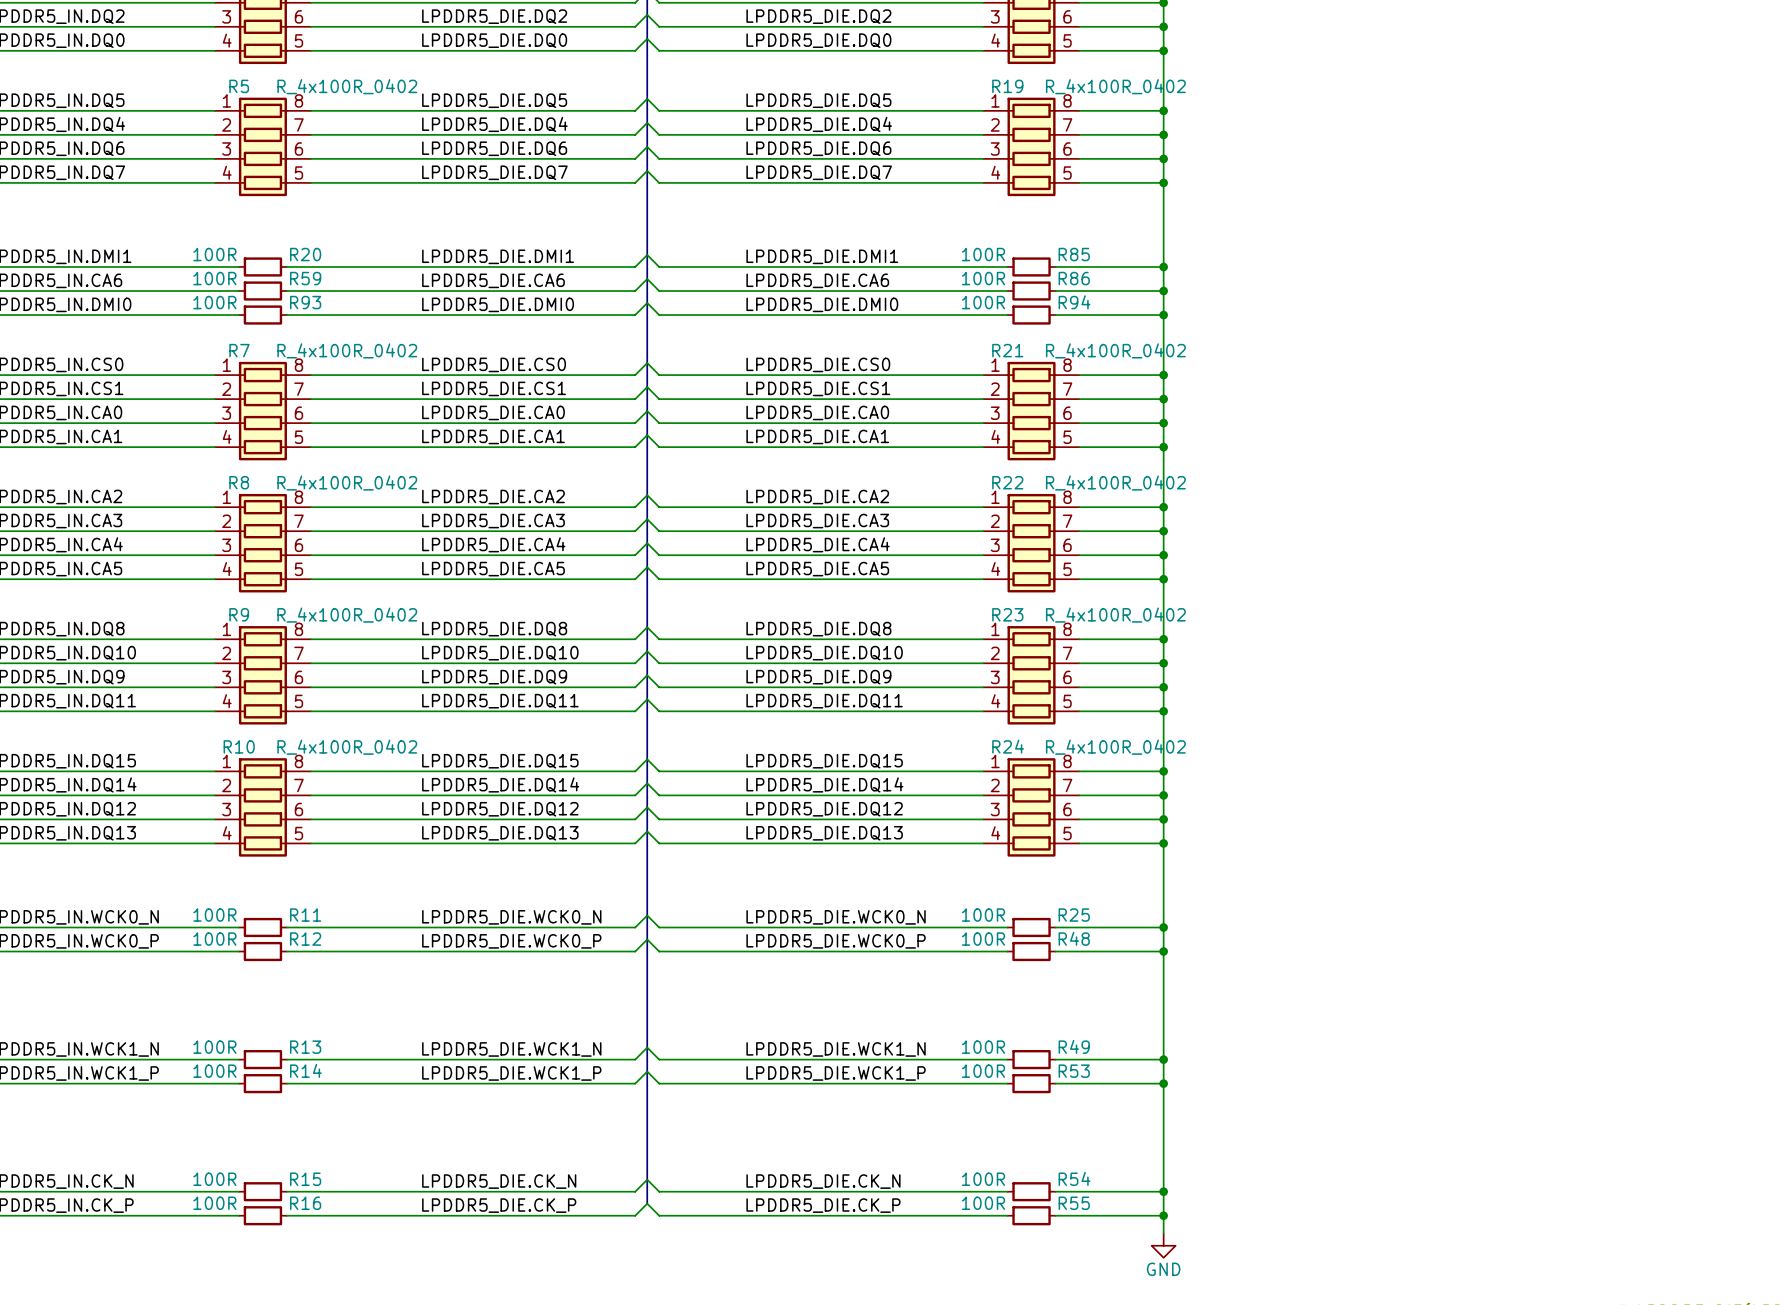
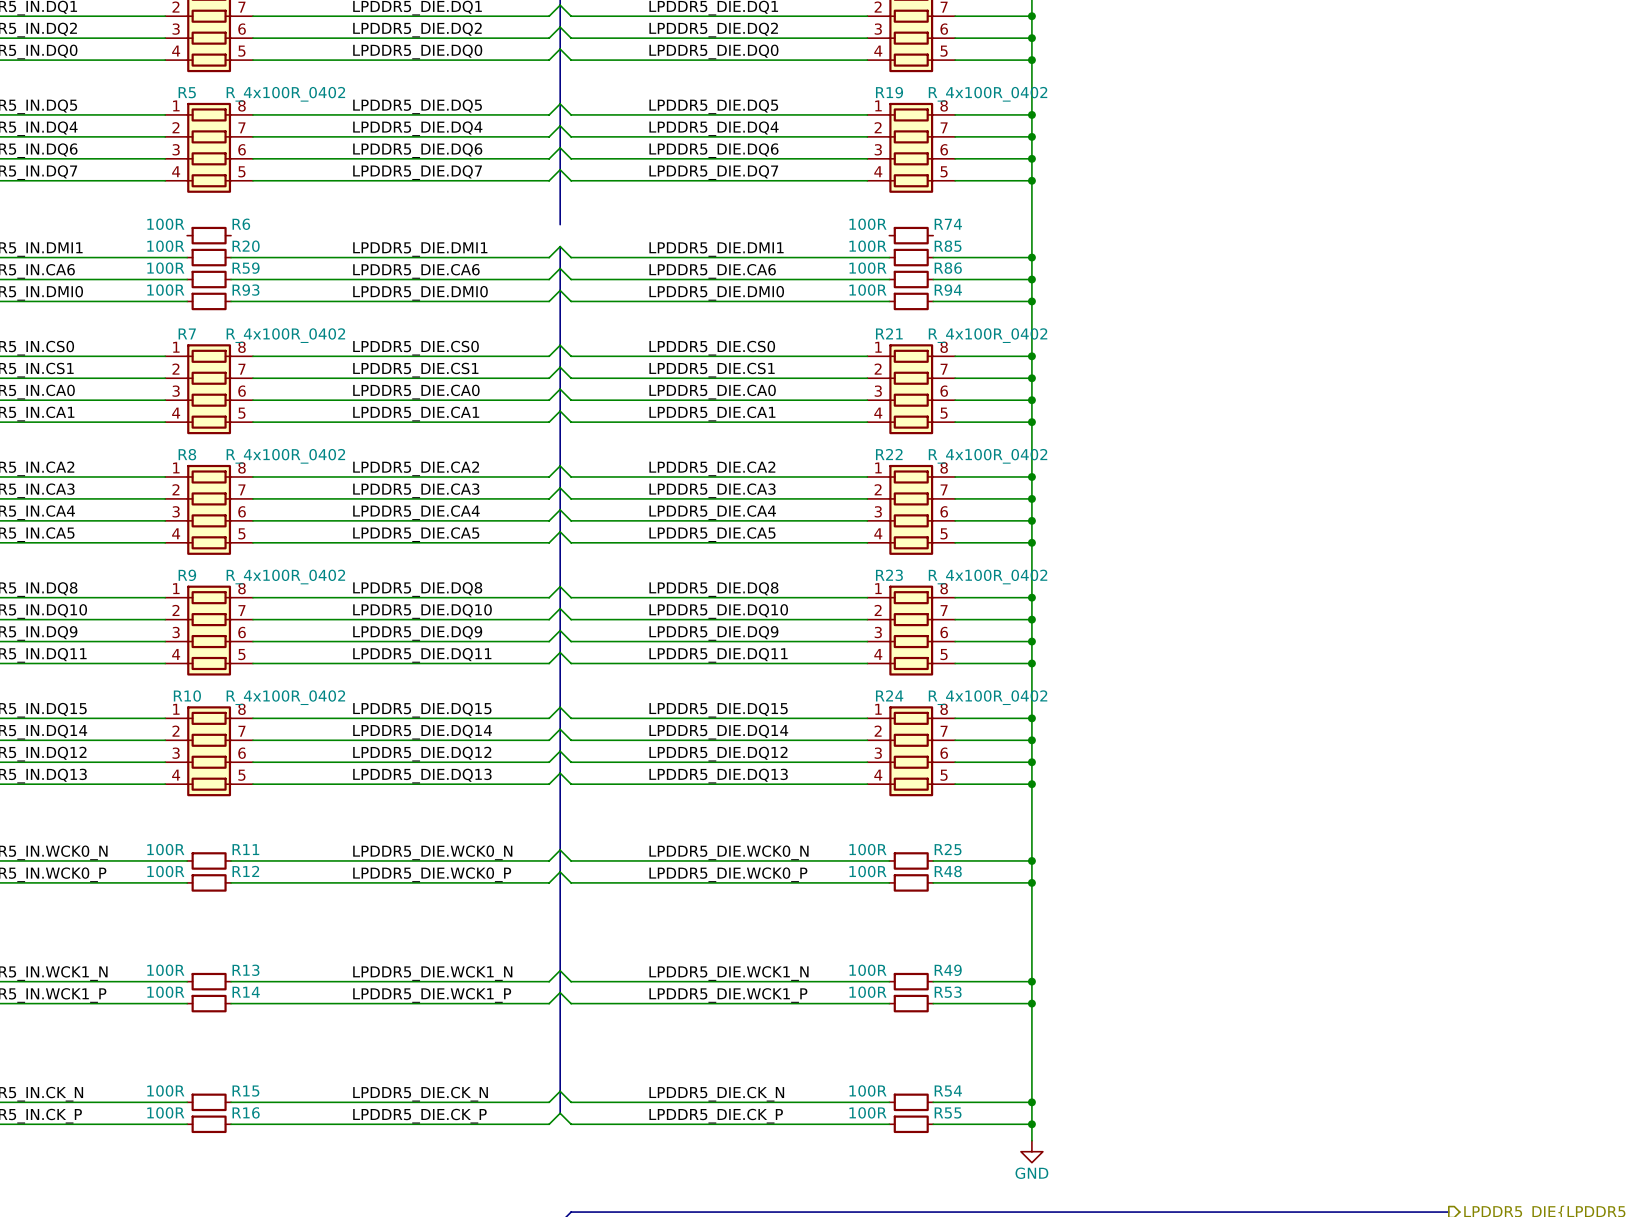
bus: (647, 230) (647, 254) -> none
R6: none -> (209, 235)
R74: none -> (911, 235)

